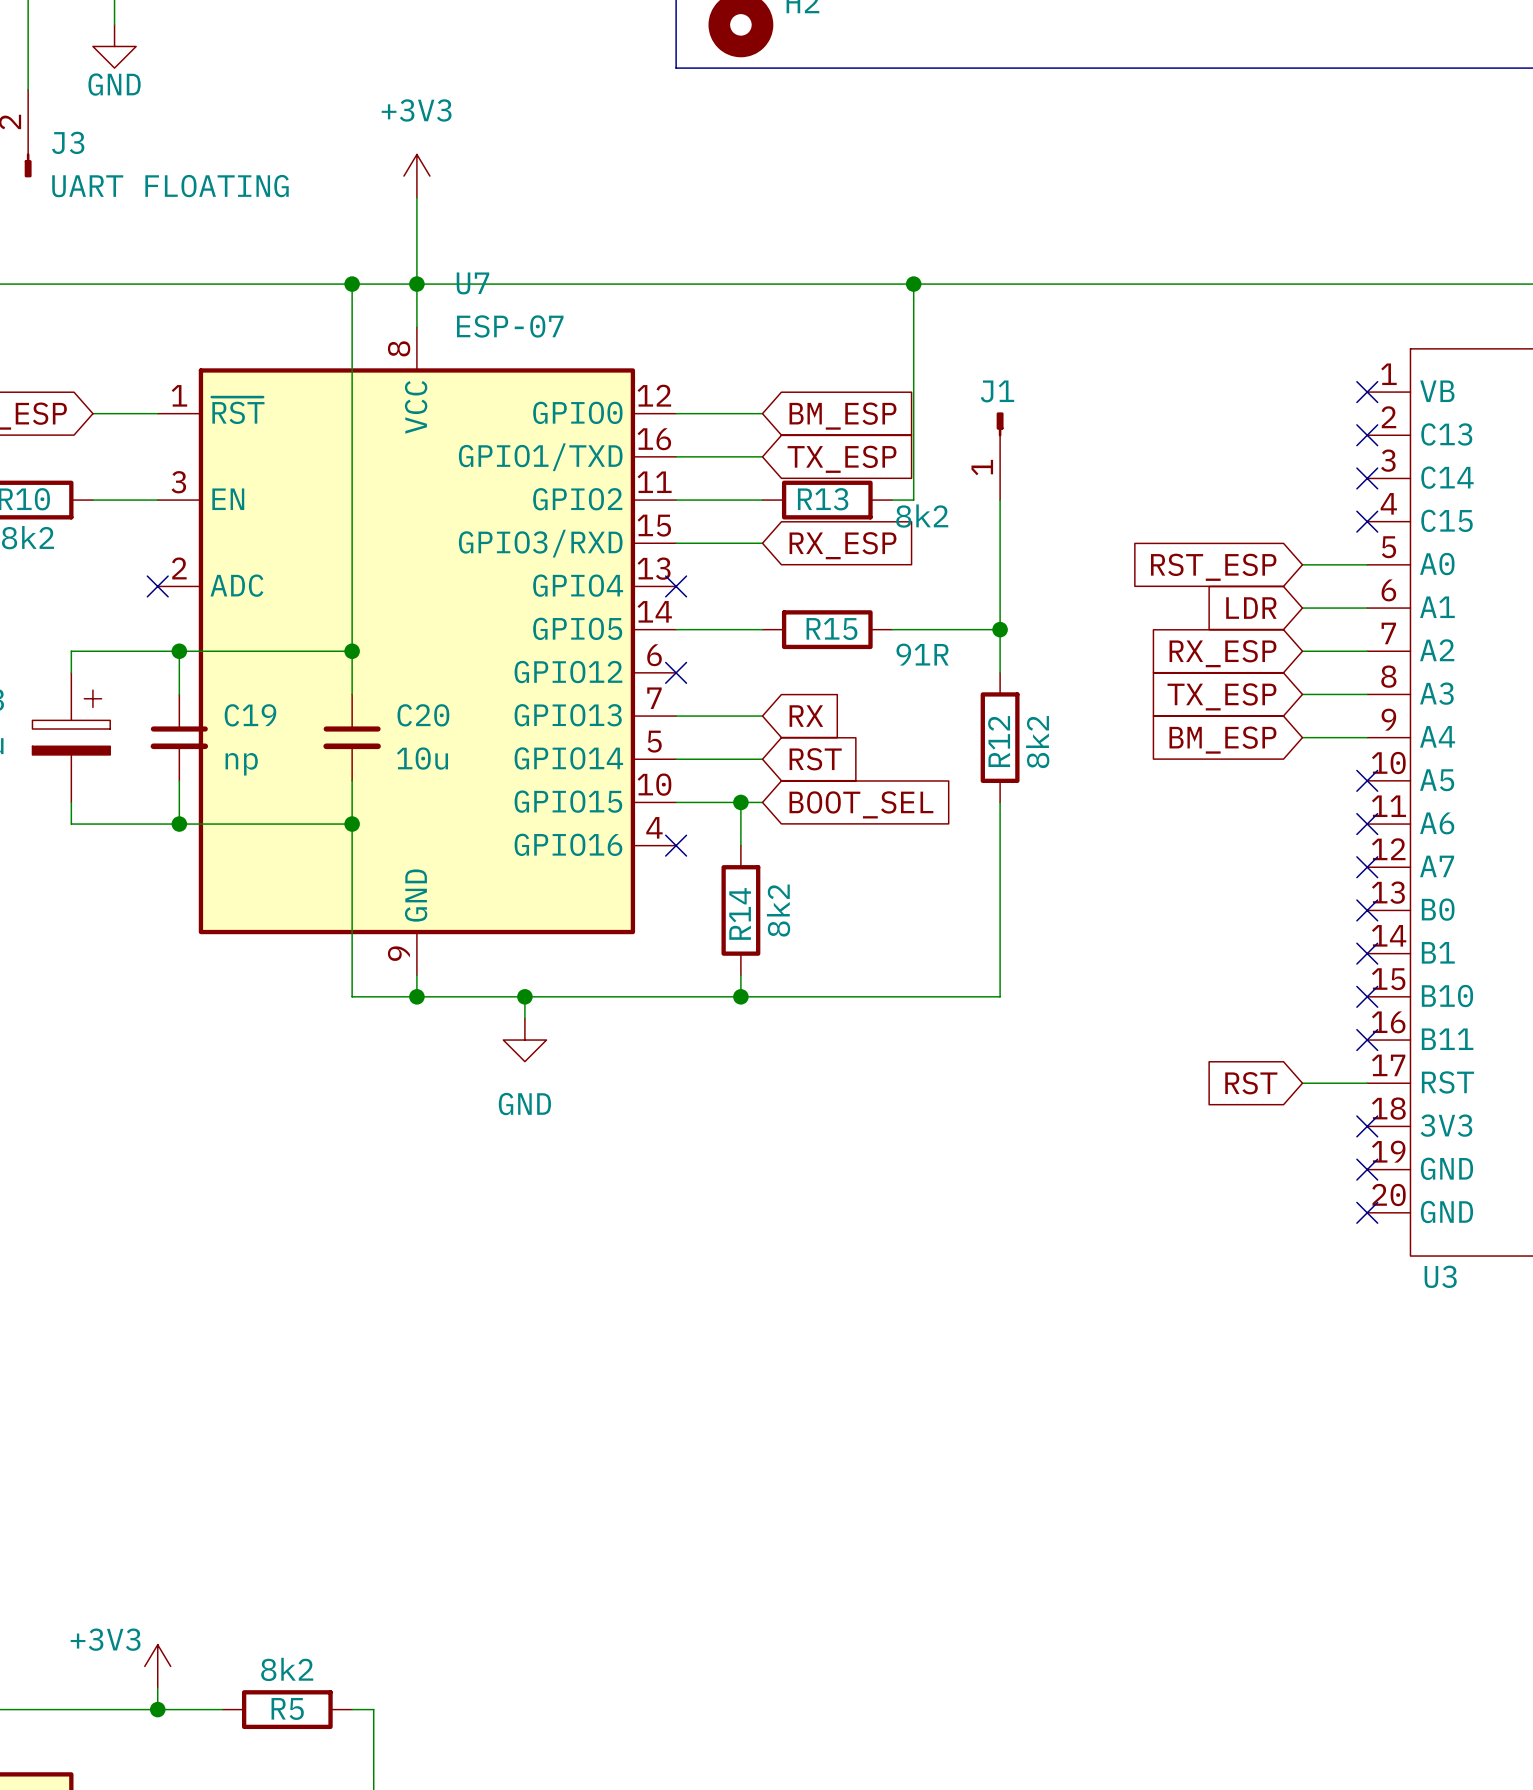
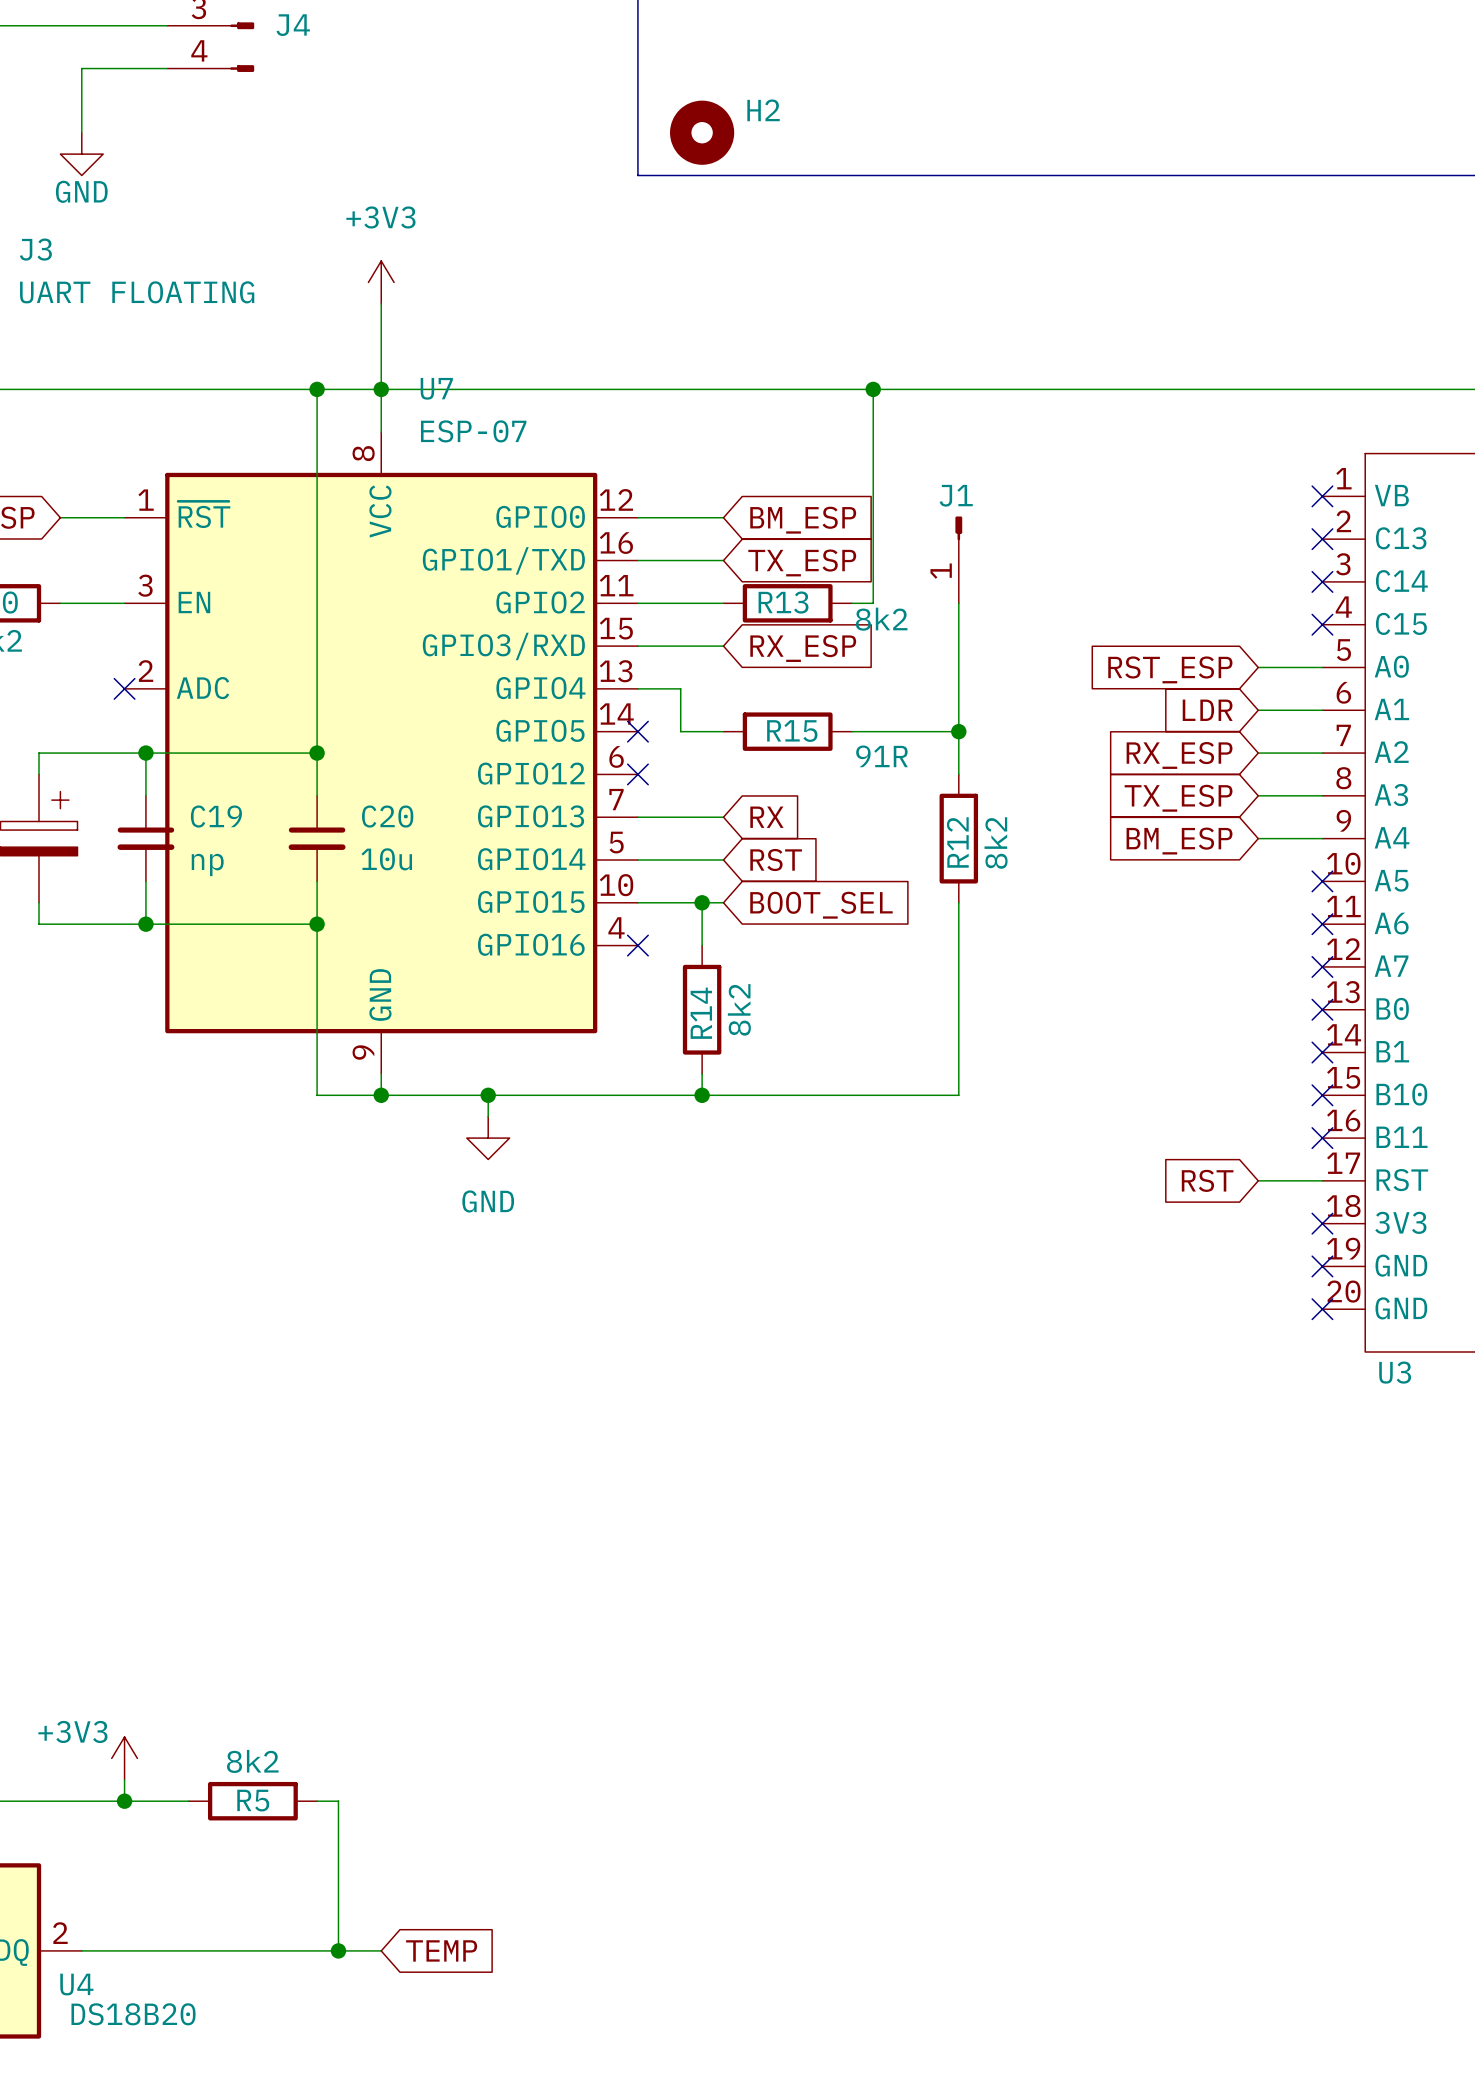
no-connect mark position: (676, 586) -> (637, 731)
wire: (676, 629) (719, 629) -> (637, 688) (680, 688) (680, 731)

